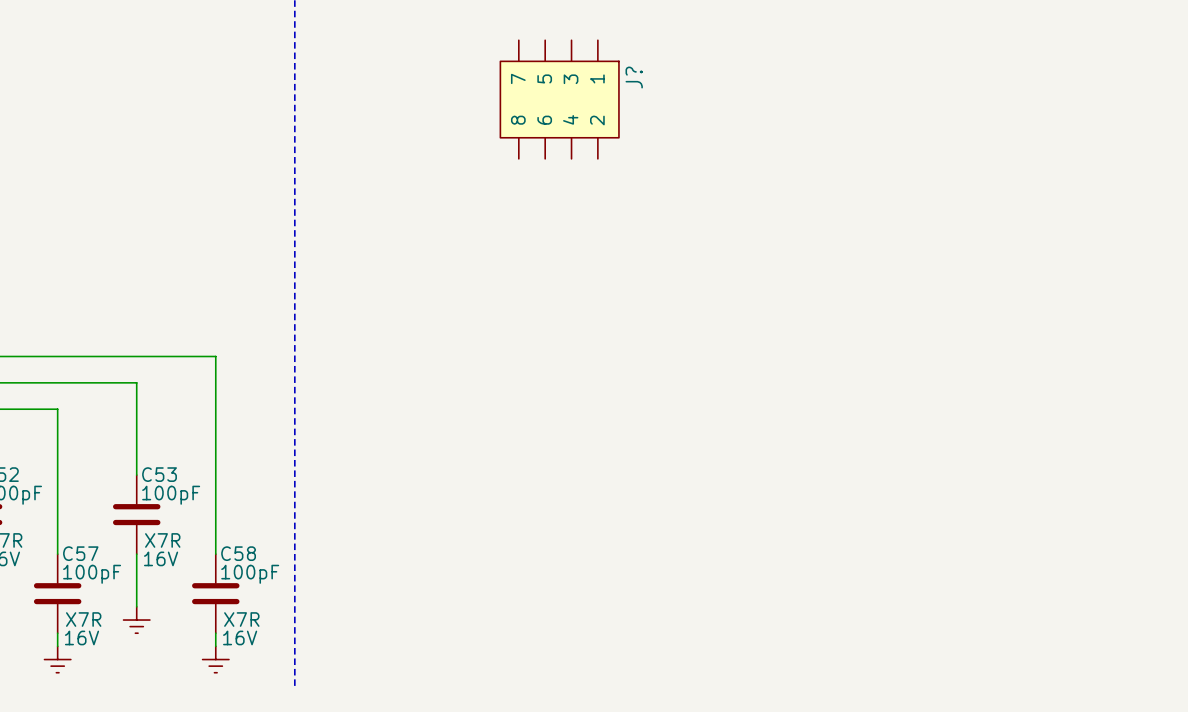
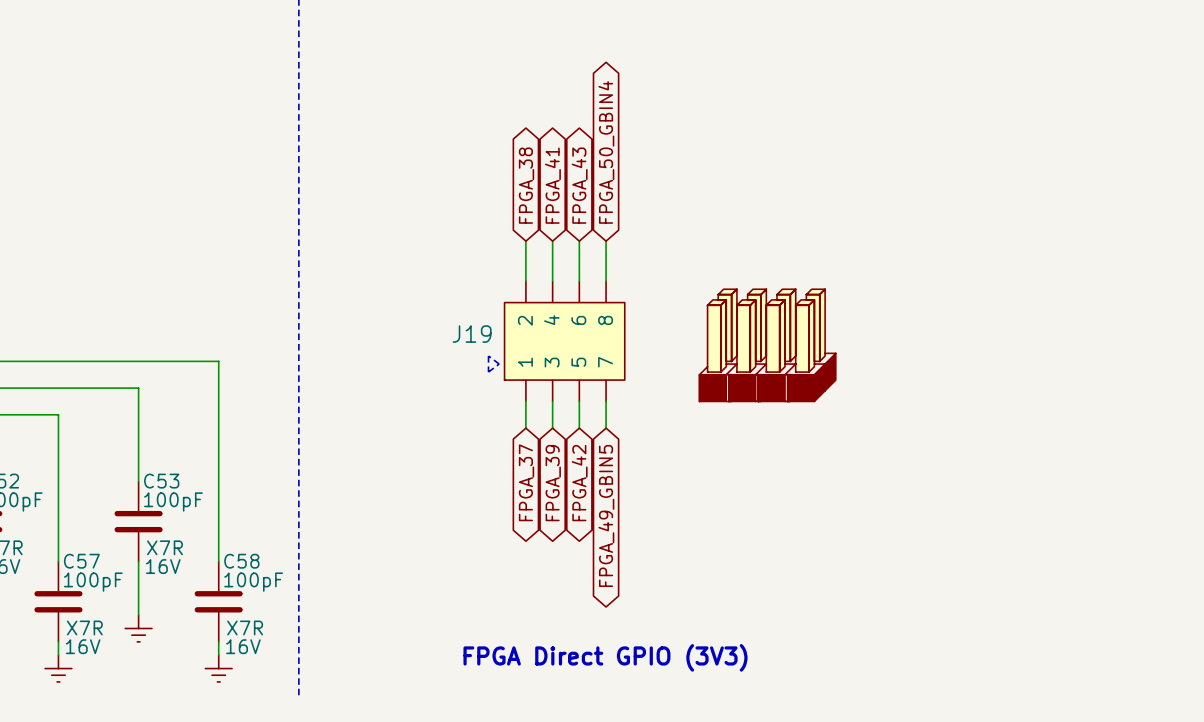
J?: (559, 99) -> none
global label: none -> FPGA_50_GBIN4 (606, 152)
global label: none -> FPGA_38 (526, 185)
global label: none -> FPGA_41 (552, 185)
global label: none -> FPGA_43 (579, 185)
wire: none -> (525, 241) (525, 281)
wire: none -> (552, 241) (552, 281)
wire: none -> (579, 241) (579, 281)
wire: none -> (606, 241) (606, 281)
J19: none -> (564, 341)
part: none -> (767, 345)
line: none -> (488, 356) (488, 372) (499, 364) (488, 356)
wire: none -> (525, 401) (525, 428)
wire: none -> (552, 401) (552, 428)
wire: none -> (579, 401) (579, 428)
wire: none -> (606, 401) (606, 428)
global label: none -> FPGA_37 (526, 482)
global label: none -> FPGA_39 (553, 483)
global label: none -> FPGA_42 (579, 483)
global label: none -> FPGA_49_GBIN5 (606, 515)
text: none -> FPGA Direct GPIO (3V3) (605, 657)

